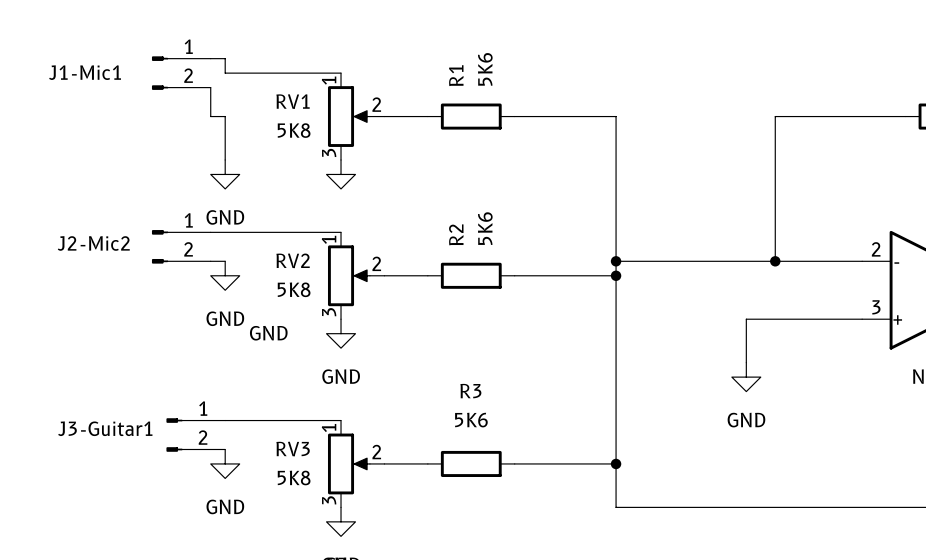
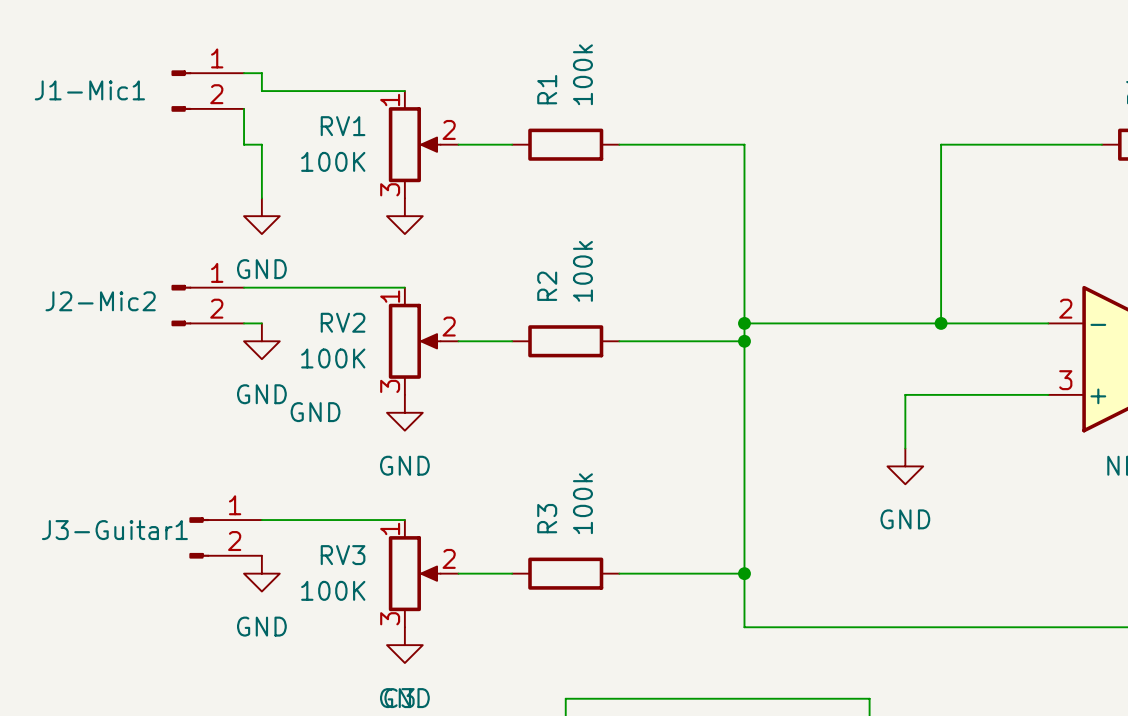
R1 value: 5K6 (485, 69) -> 100k (582, 74)
RV1 value: 5K8 (294, 130) -> 100K (333, 161)
R2 value: 5K6 (485, 228) -> 100k (582, 271)
RV2 value: 5K8 (294, 289) -> 100K (333, 358)
R3 name rotation: 0° (470, 391) -> 90° counterclockwise (547, 518)
R3 value: 5K6 (471, 420) -> 100k (582, 503)
RV3 value: 5K8 (294, 477) -> 100K (333, 590)

